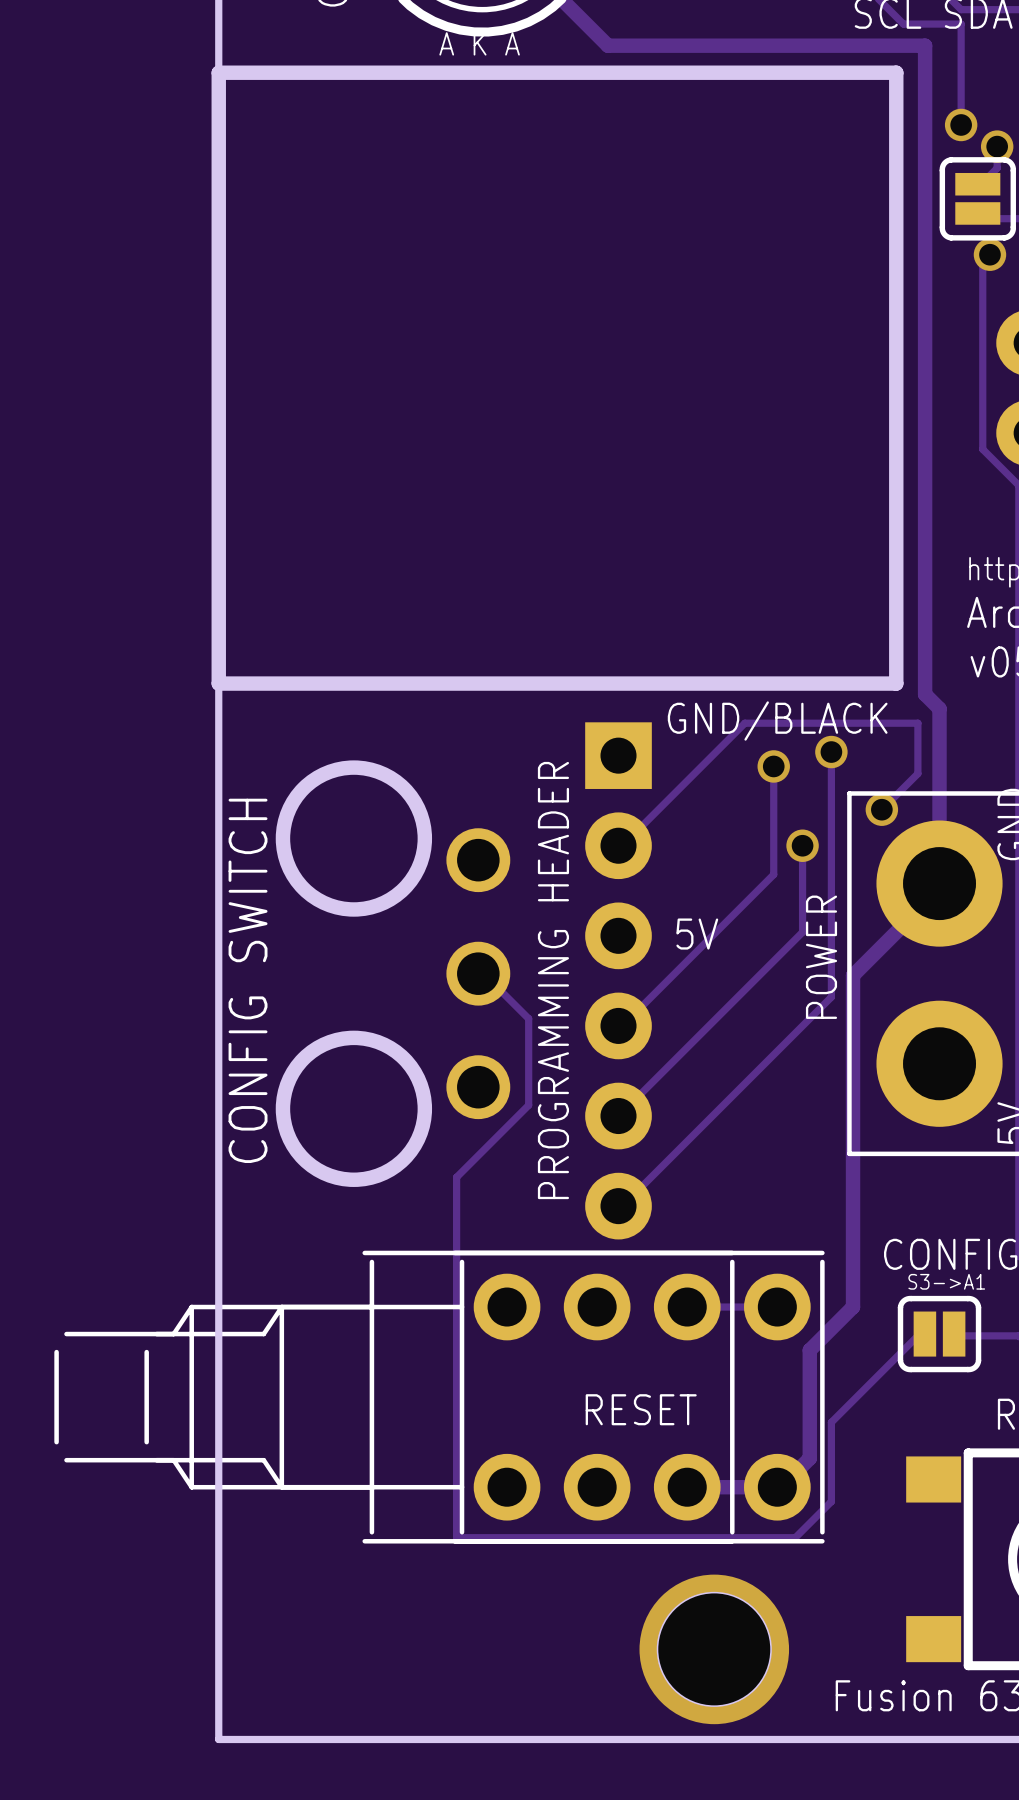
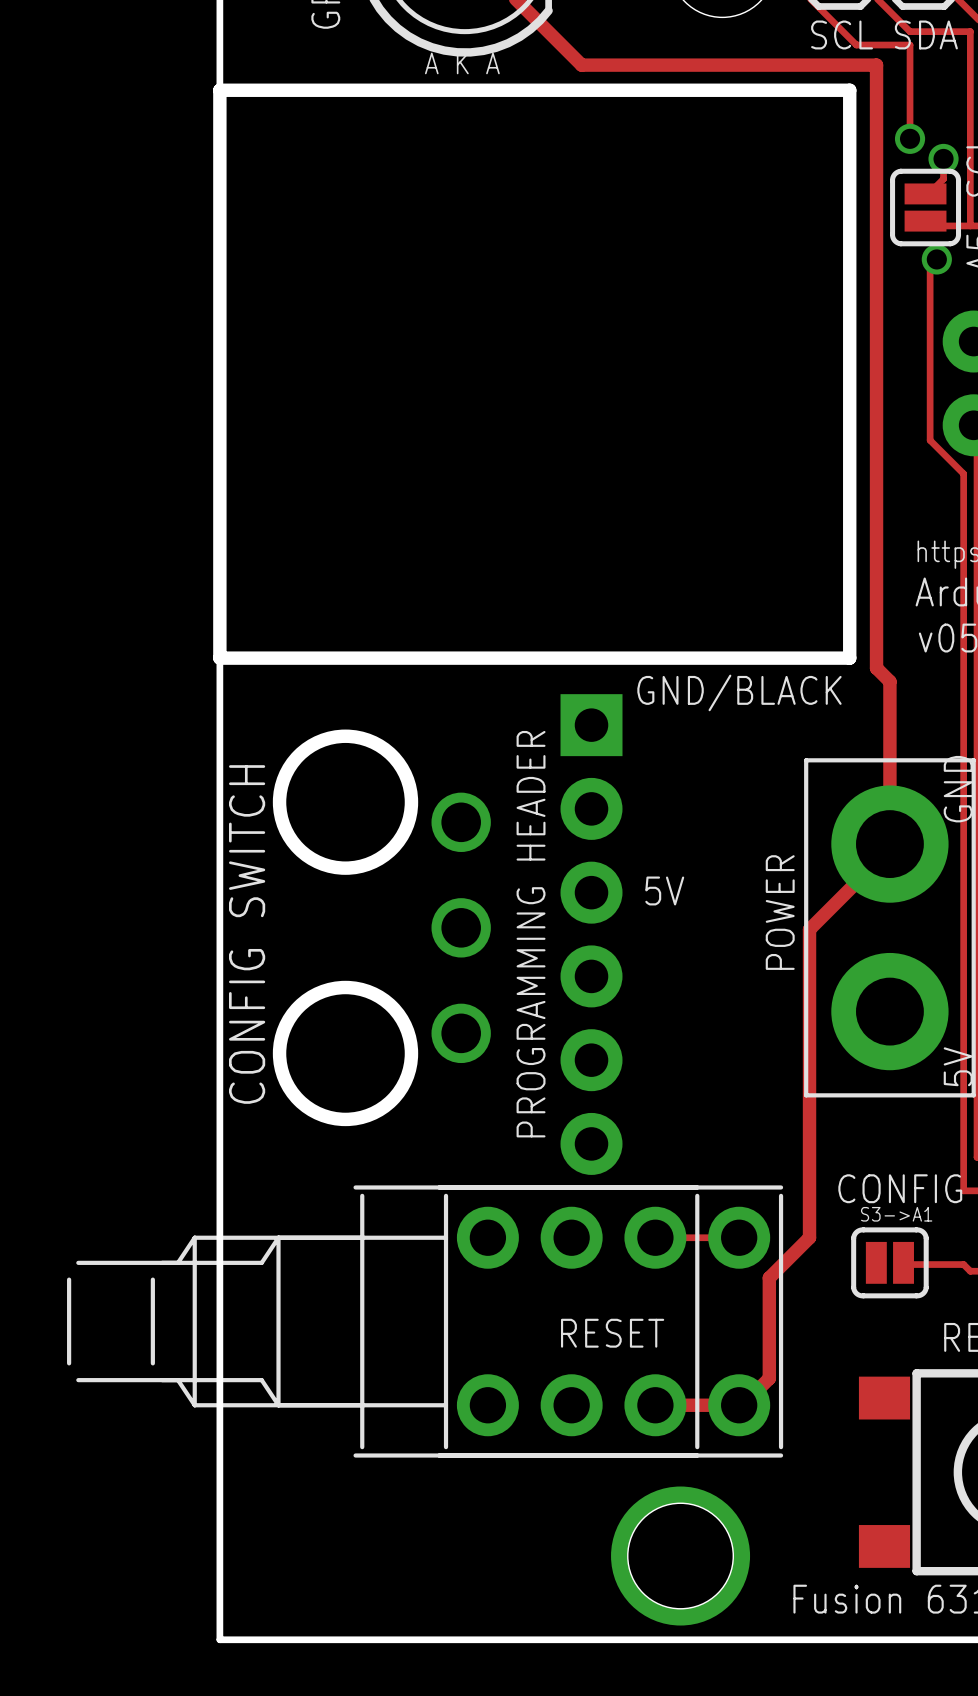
track: (831, 752) (831, 997) (622, 1206) (618, 1206) -> none
via: (831, 752) -> none
track: (773, 766) (773, 874) (622, 1025) (618, 1025) -> none
via: (773, 766) -> none
track: (881, 809) (917, 773) (917, 723) (744, 723) (622, 845) (618, 845) -> none
via: (881, 809) -> none
track: (802, 845) (802, 932) (618, 1116) -> none
via: (802, 845) -> none
track: (478, 973) (485, 975) (528, 1018) (528, 1105) (456, 1177) (456, 1537) (795, 1537) (831, 1501) (831, 1422) (917, 1335) (924, 1334) -> none

